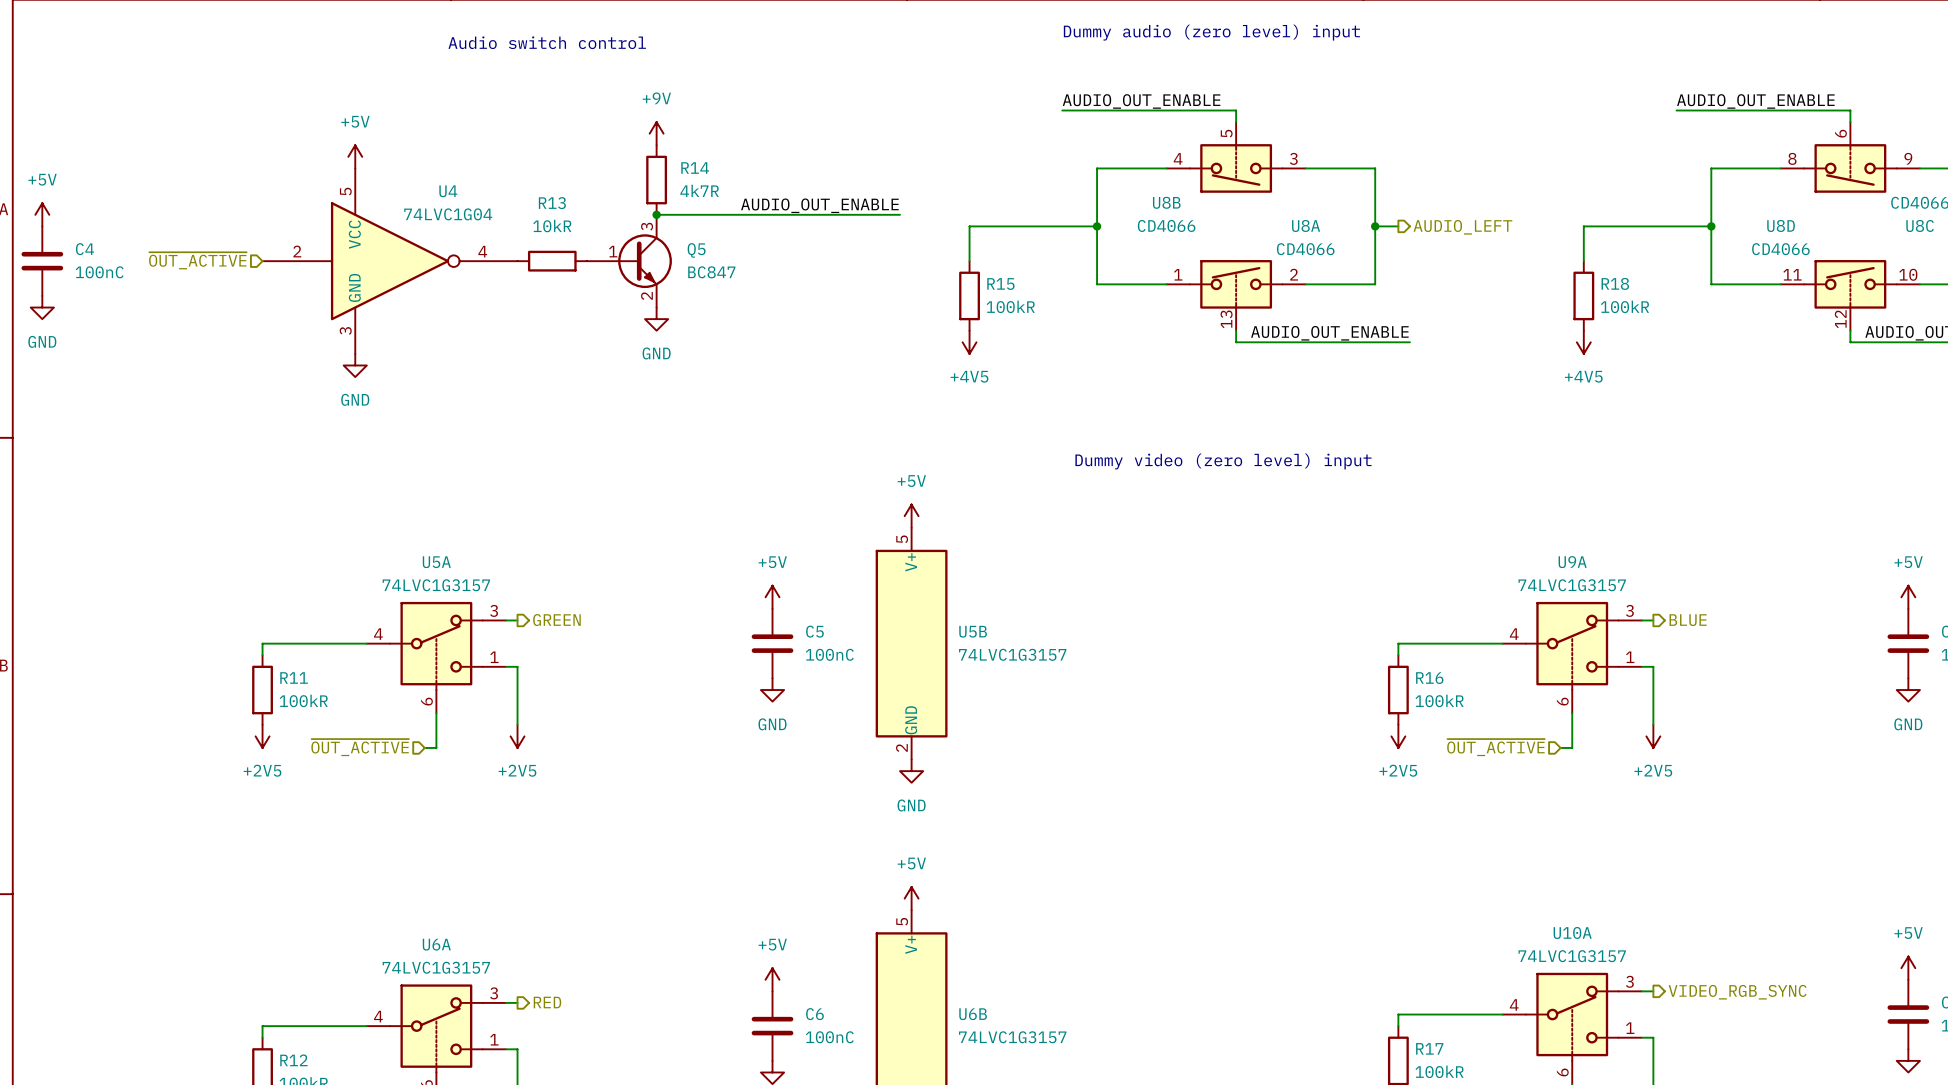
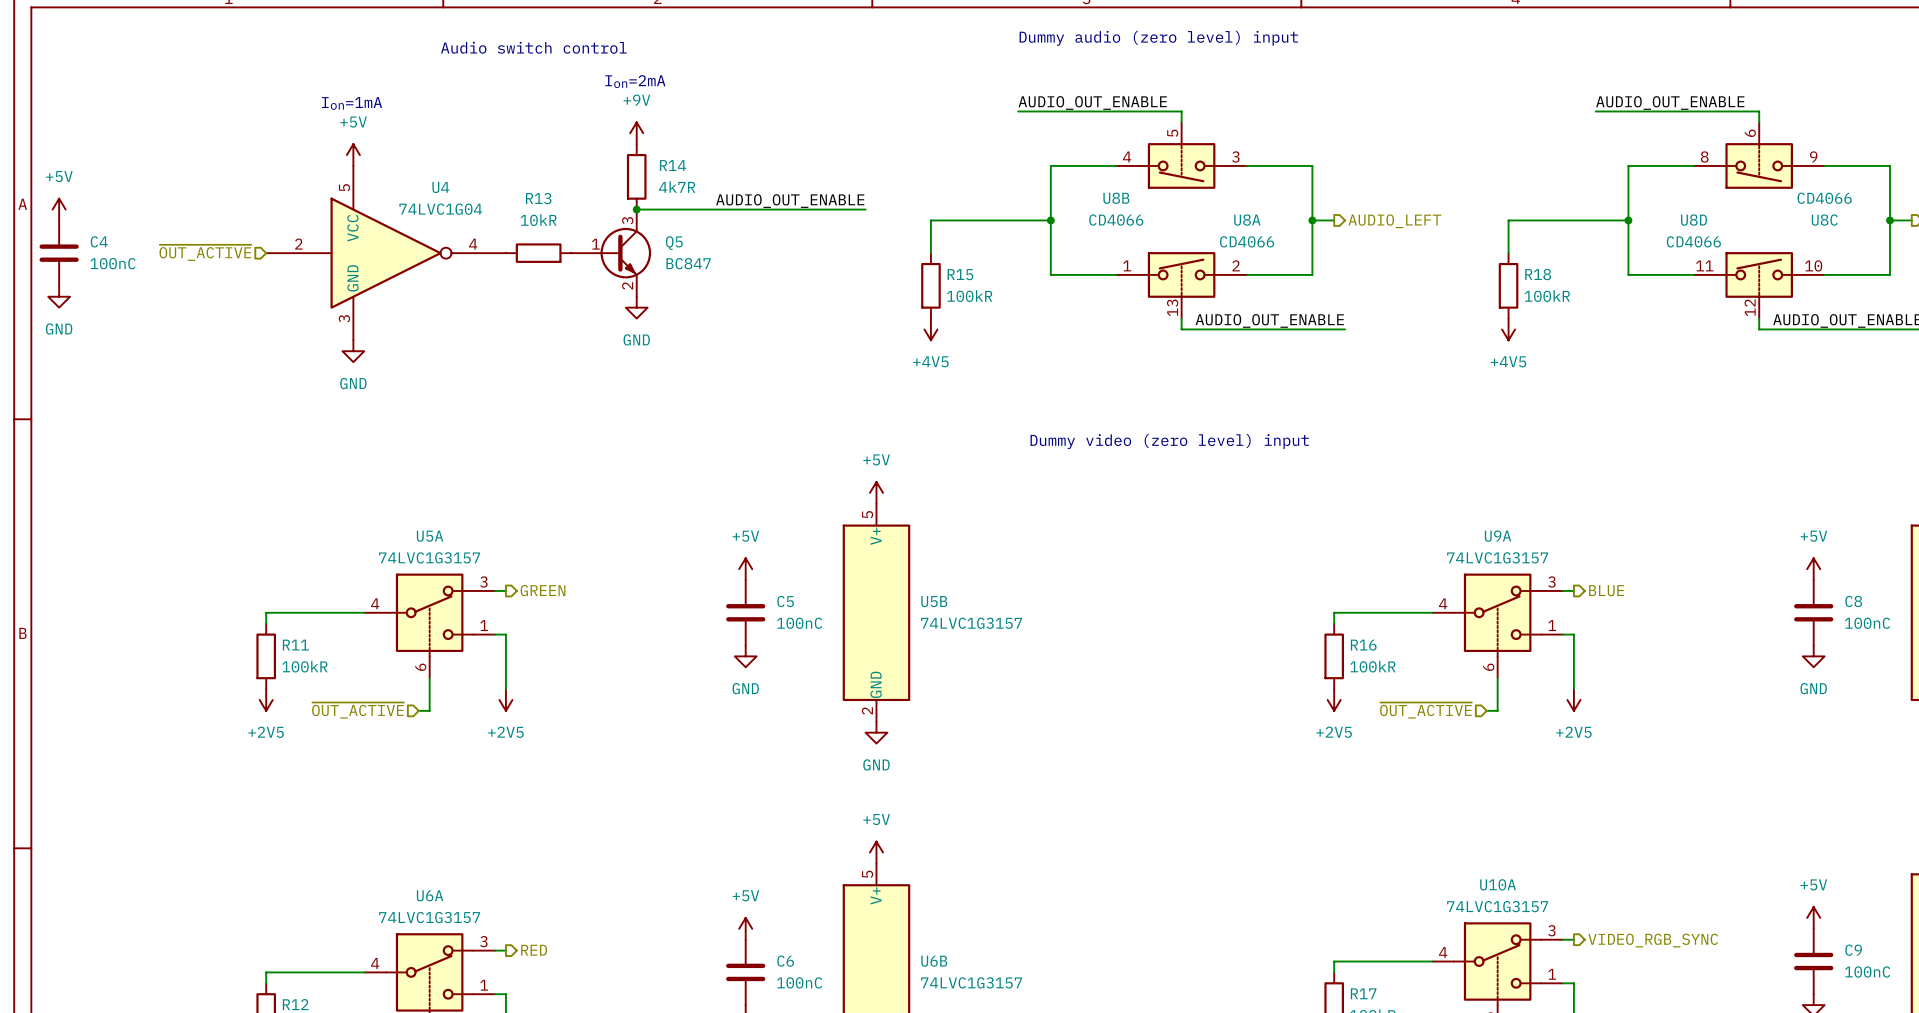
text: none -> Ion=2mA (635, 81)
text: none -> Ion=1mA (352, 103)

